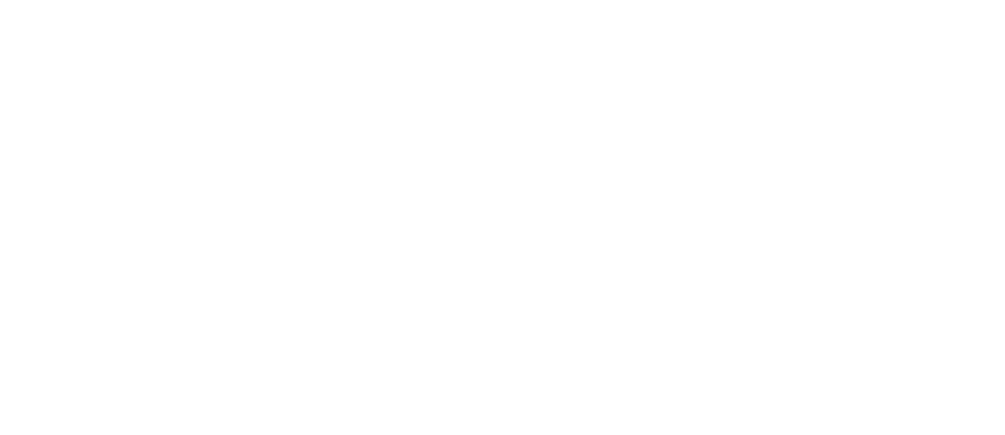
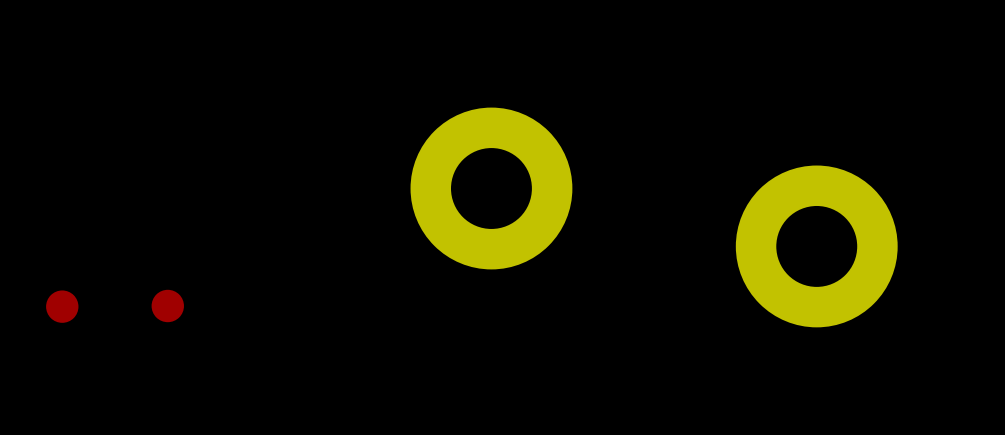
part: none -> (491, 188)
part: none -> (816, 246)
part: none -> (62, 306)
part: none -> (167, 306)

